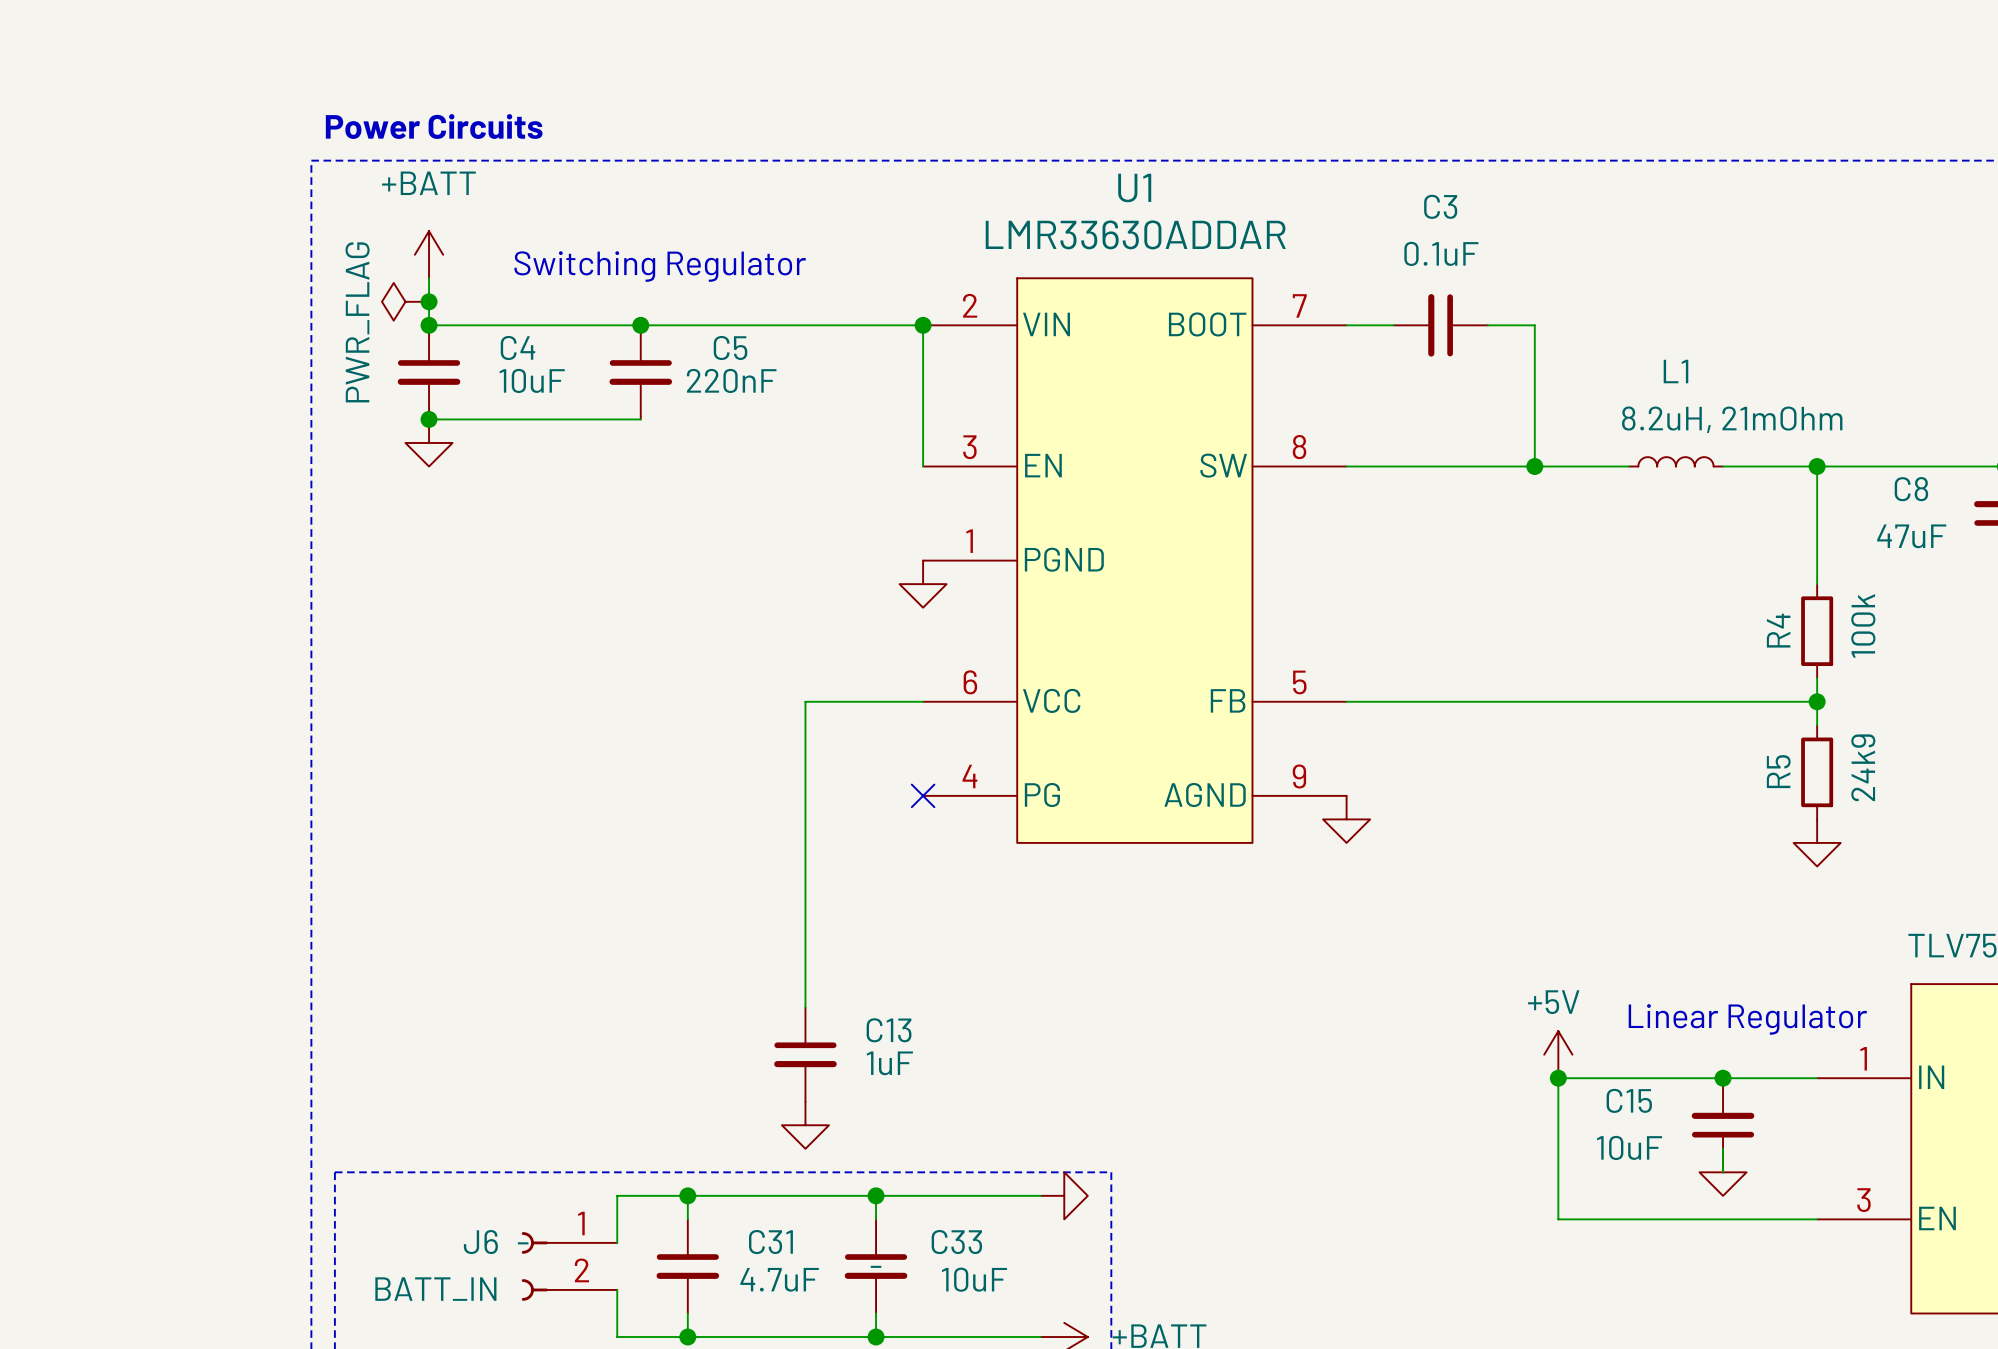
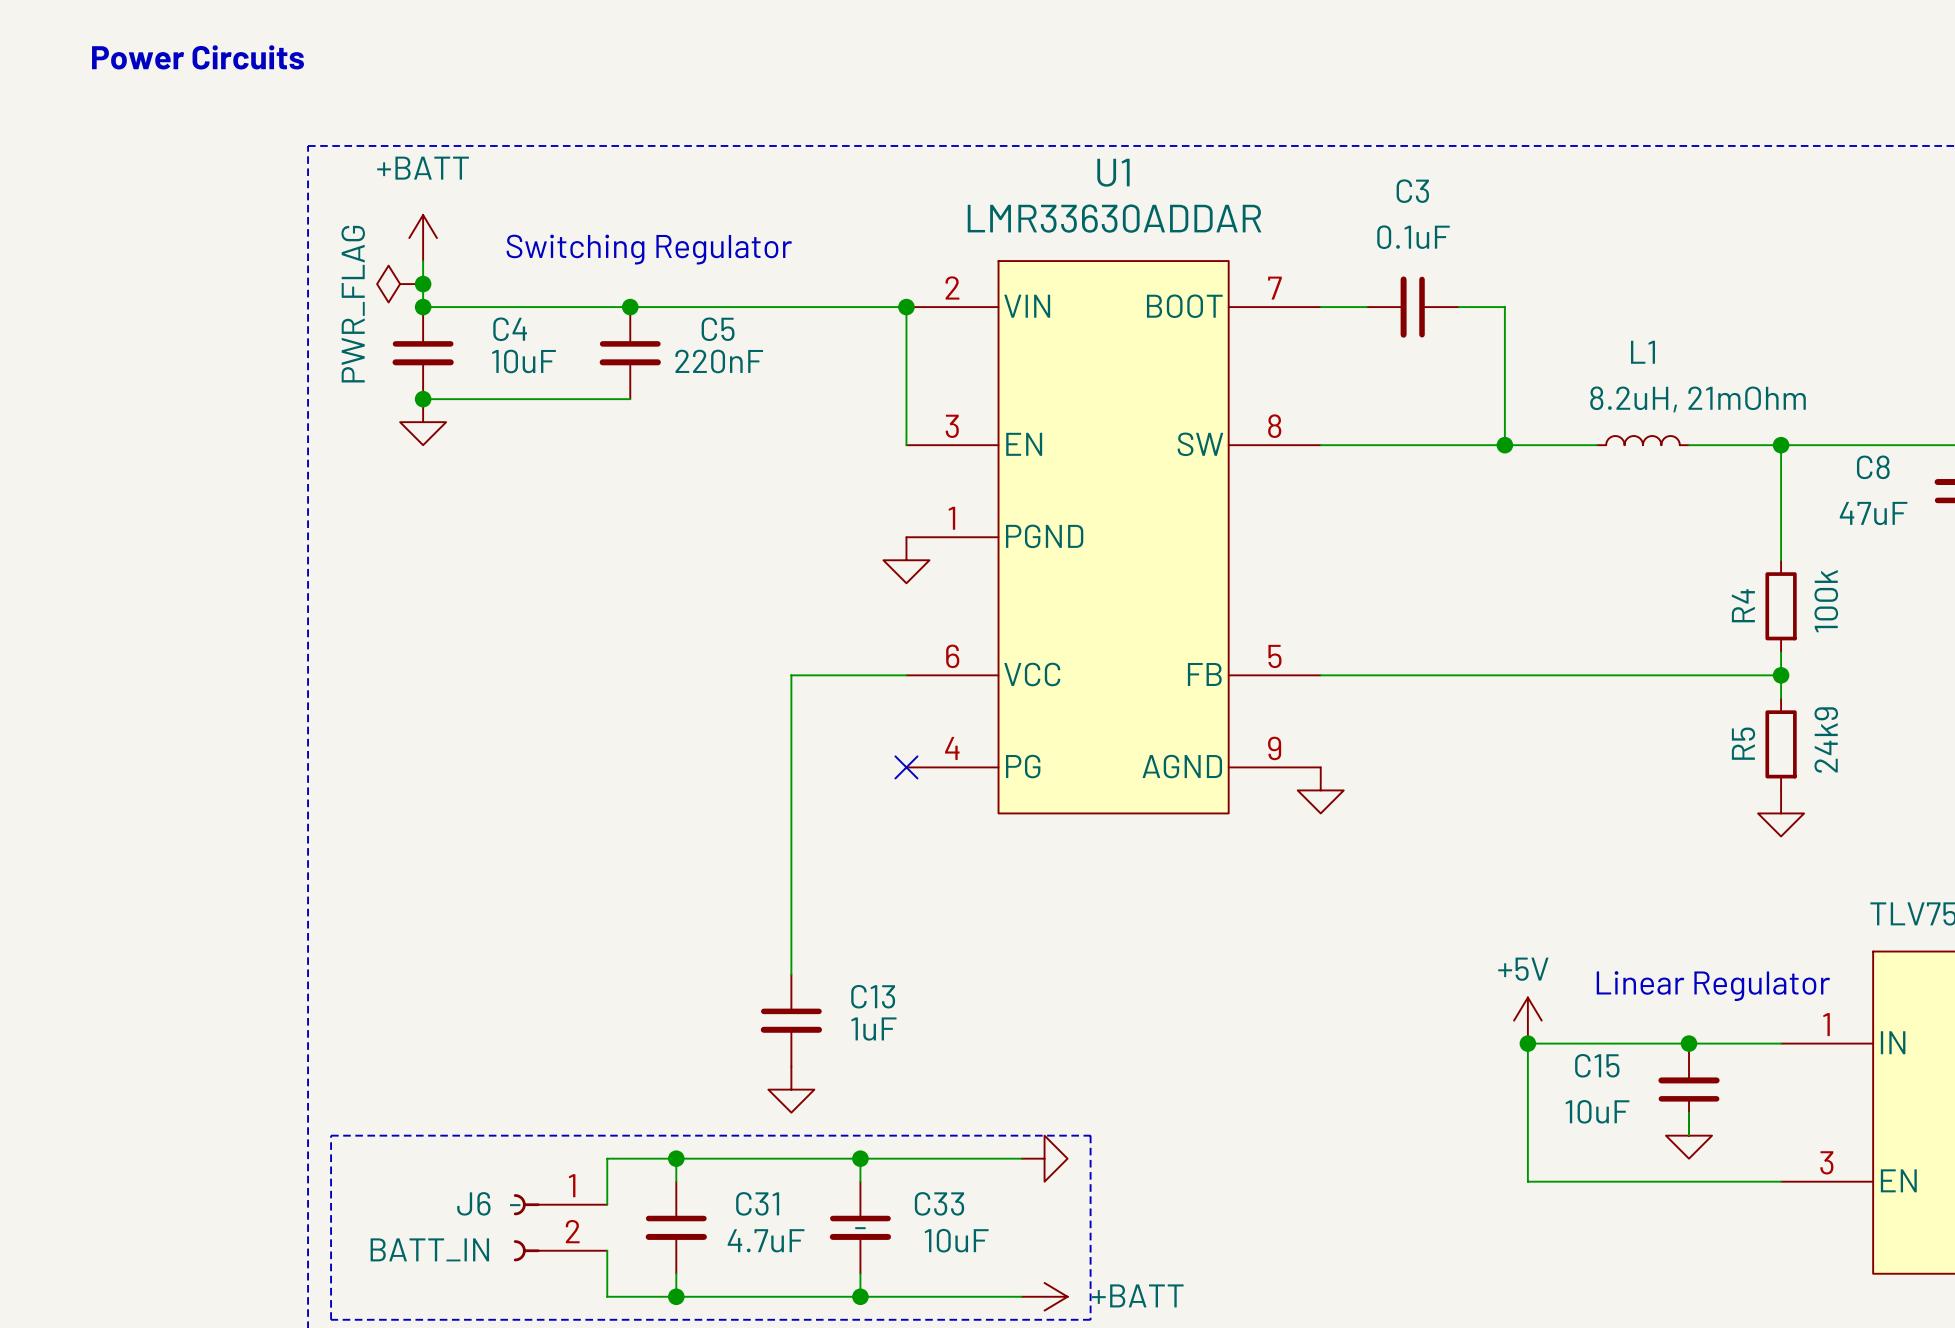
text position: Power Circuits (434, 126) -> Power Circuits (198, 57)

